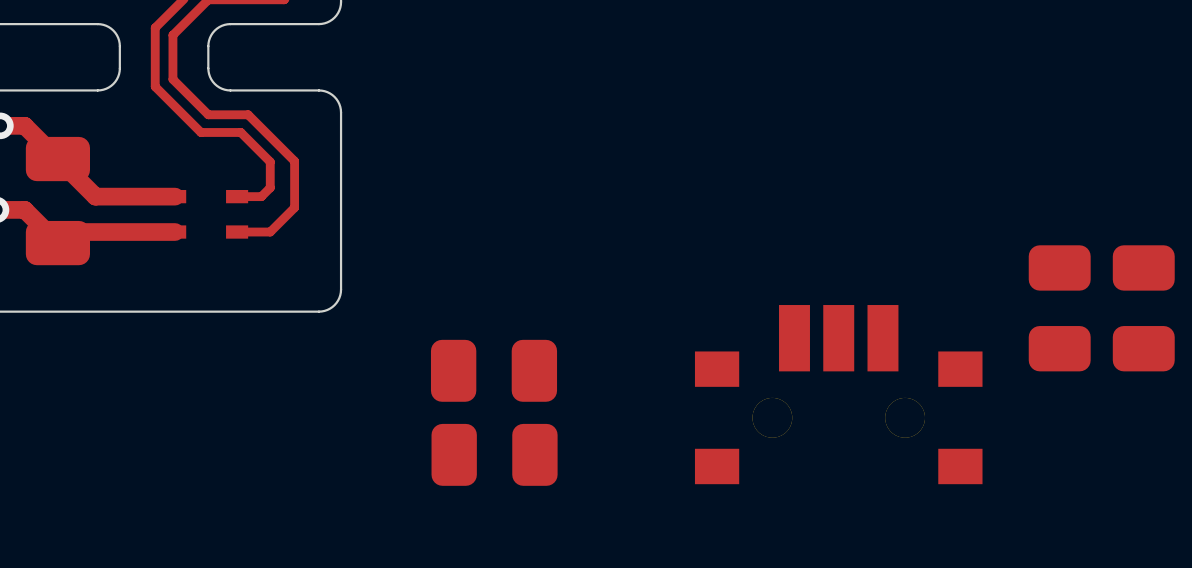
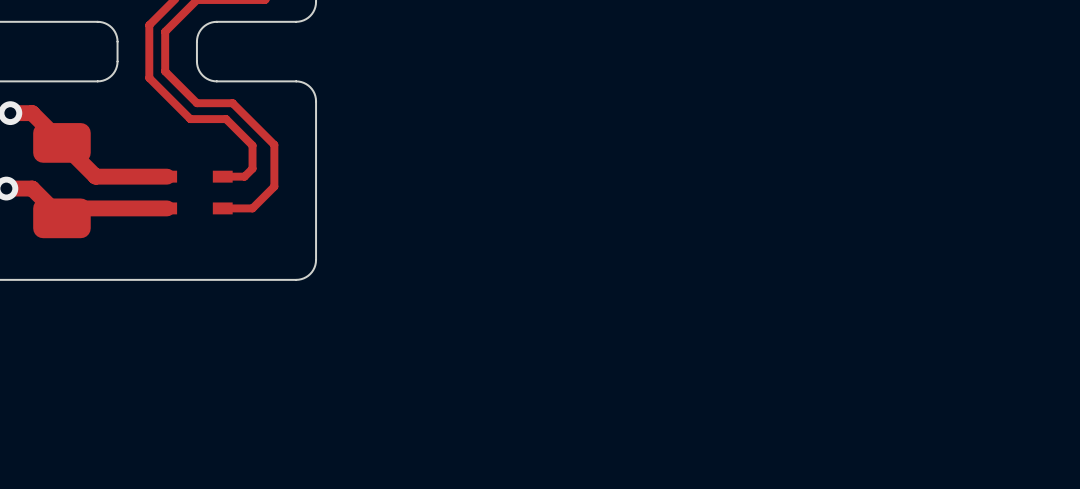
part: (1059, 308) -> none
part: (1143, 308) -> none
part: (494, 370) -> none
part: (838, 394) -> none
part: (494, 454) -> none

